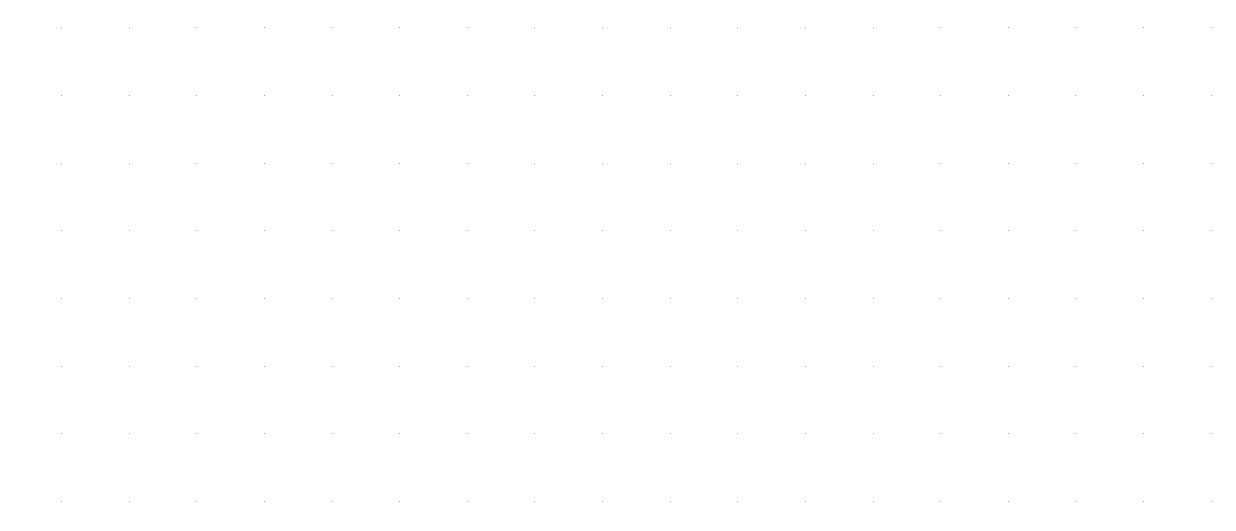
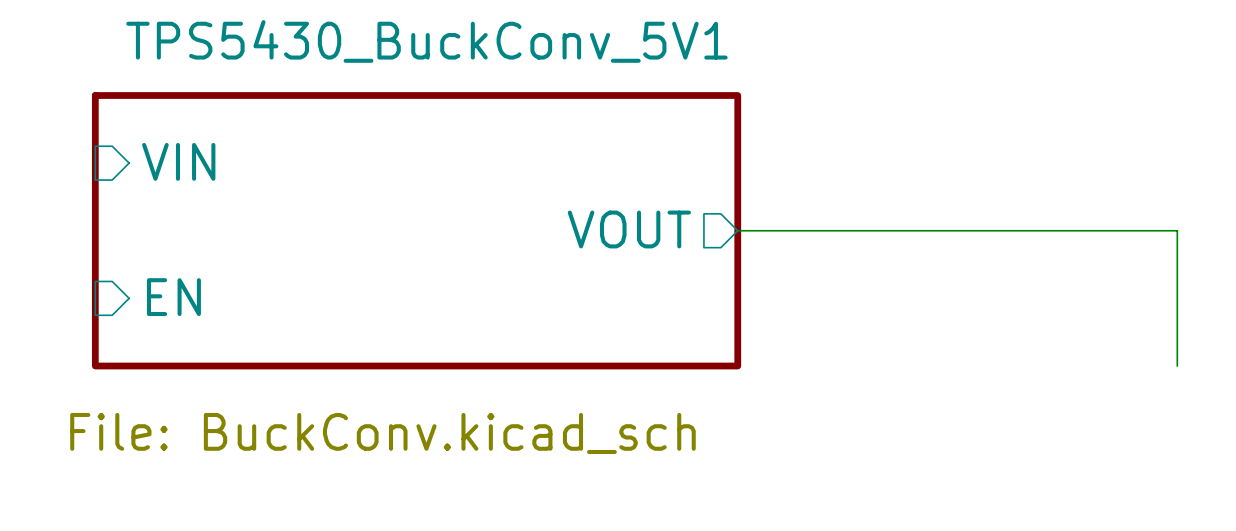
sheet pin: none -> VIN (178, 161)
sheet pin: none -> VOUT (629, 229)
sheet TPS5430_BuckConv_5V1: none -> File: BuckConv.kicad_sch (416, 230)
wire: none -> (737, 230) (1177, 230) (1177, 366)
sheet pin: none -> EN (173, 297)

